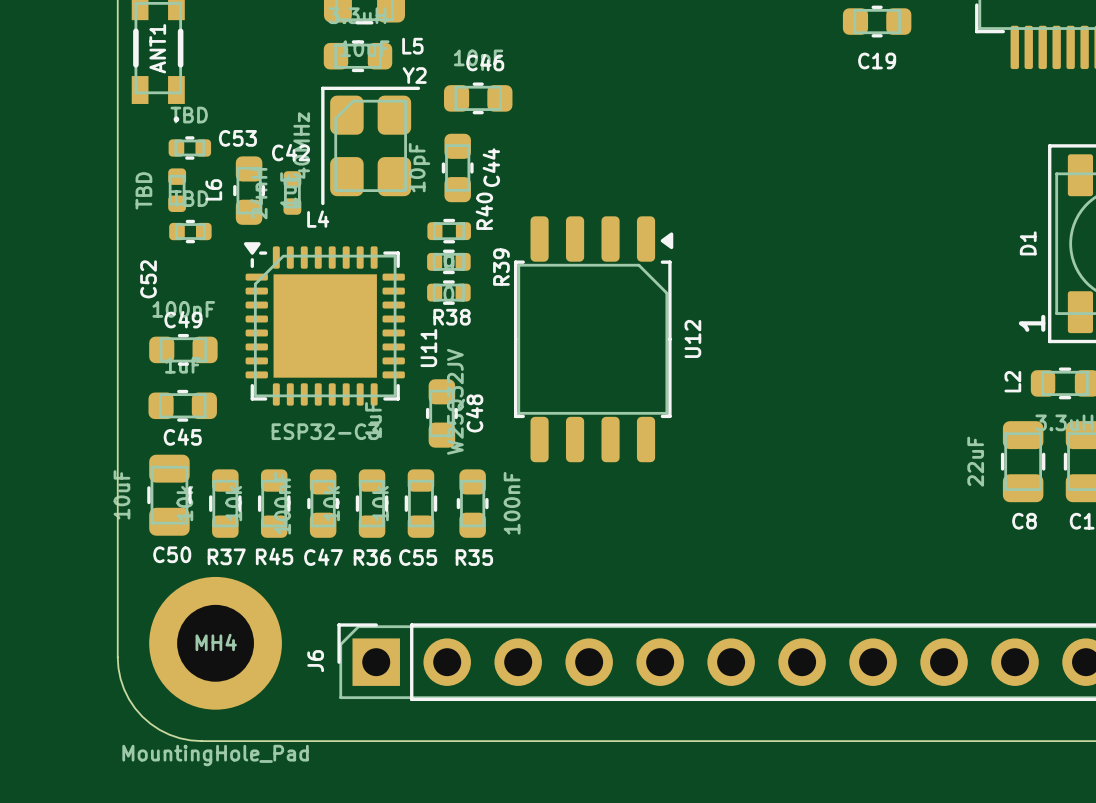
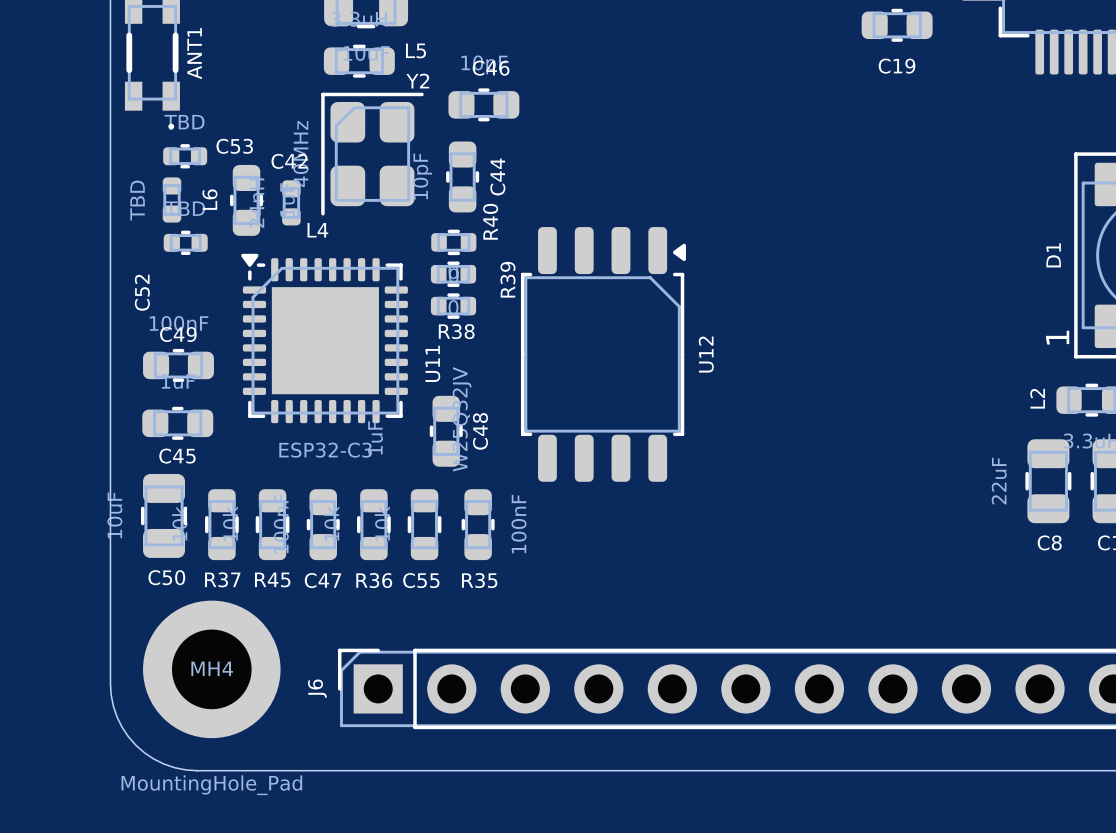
ANT1 name position: ANT1 (157, 48) -> ANT1 (194, 53)

